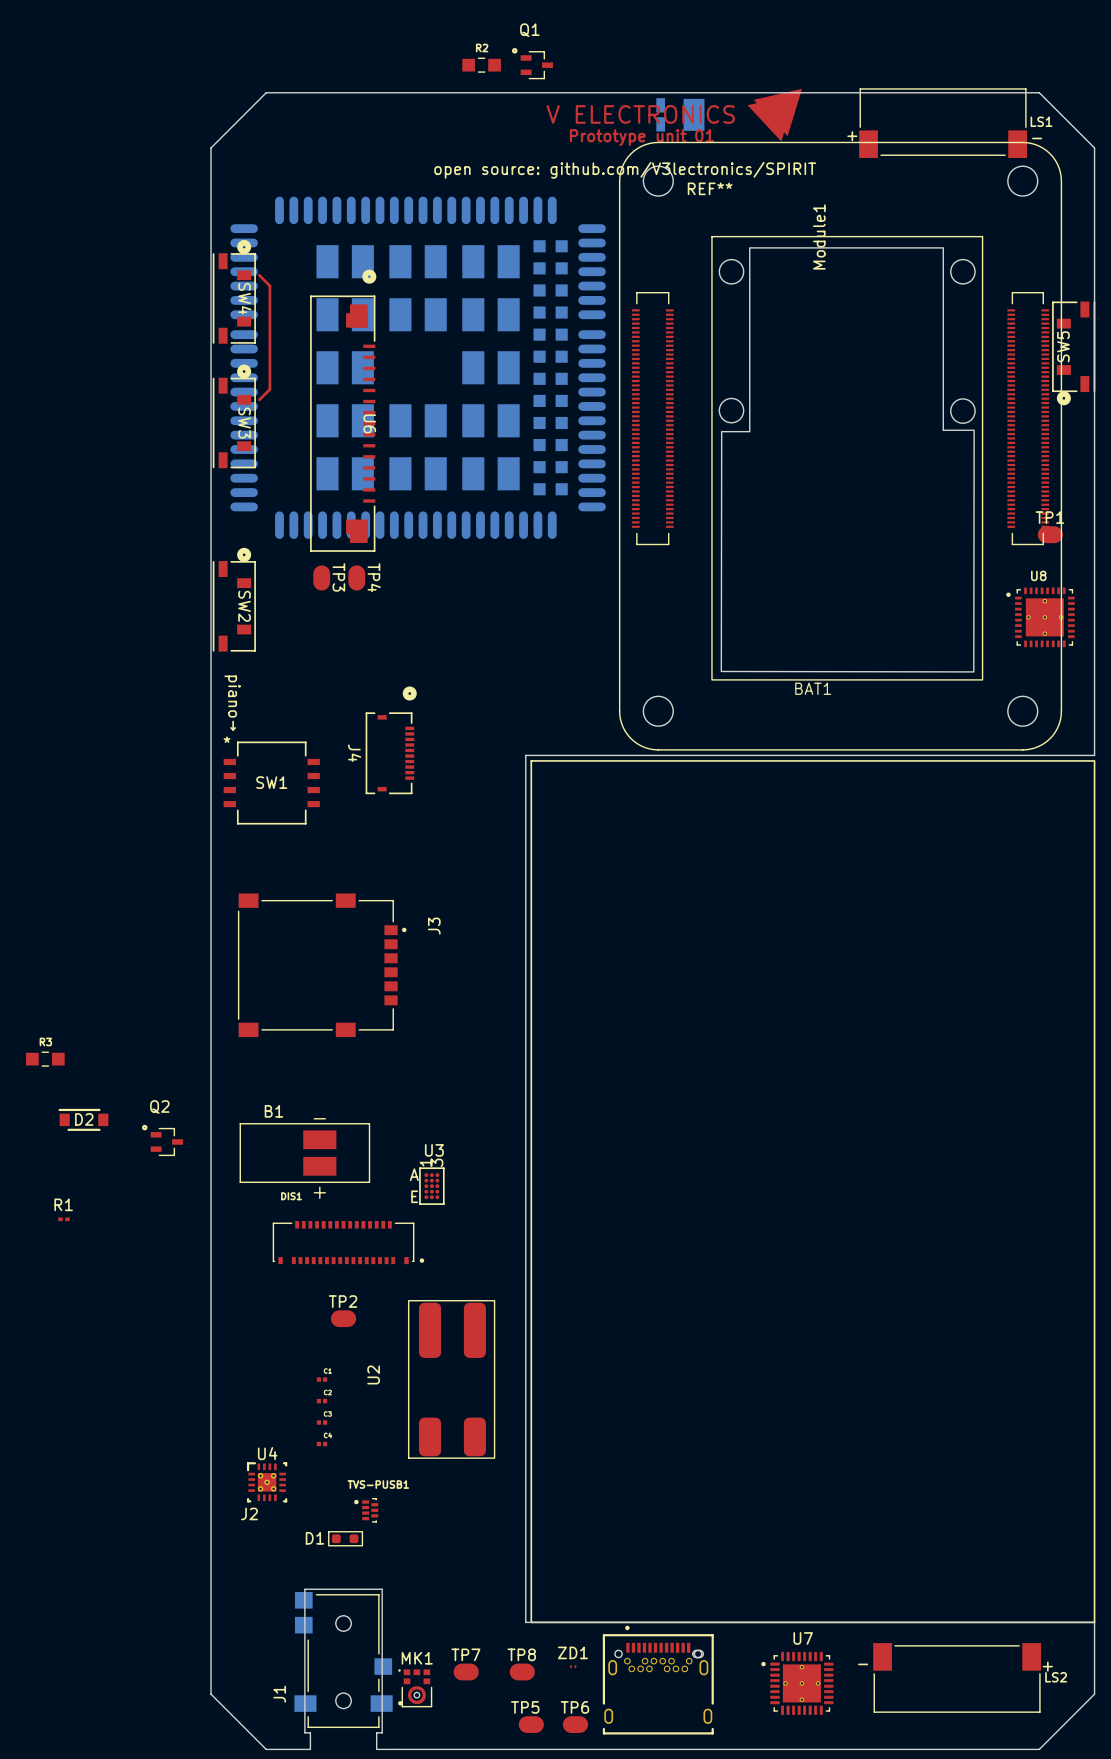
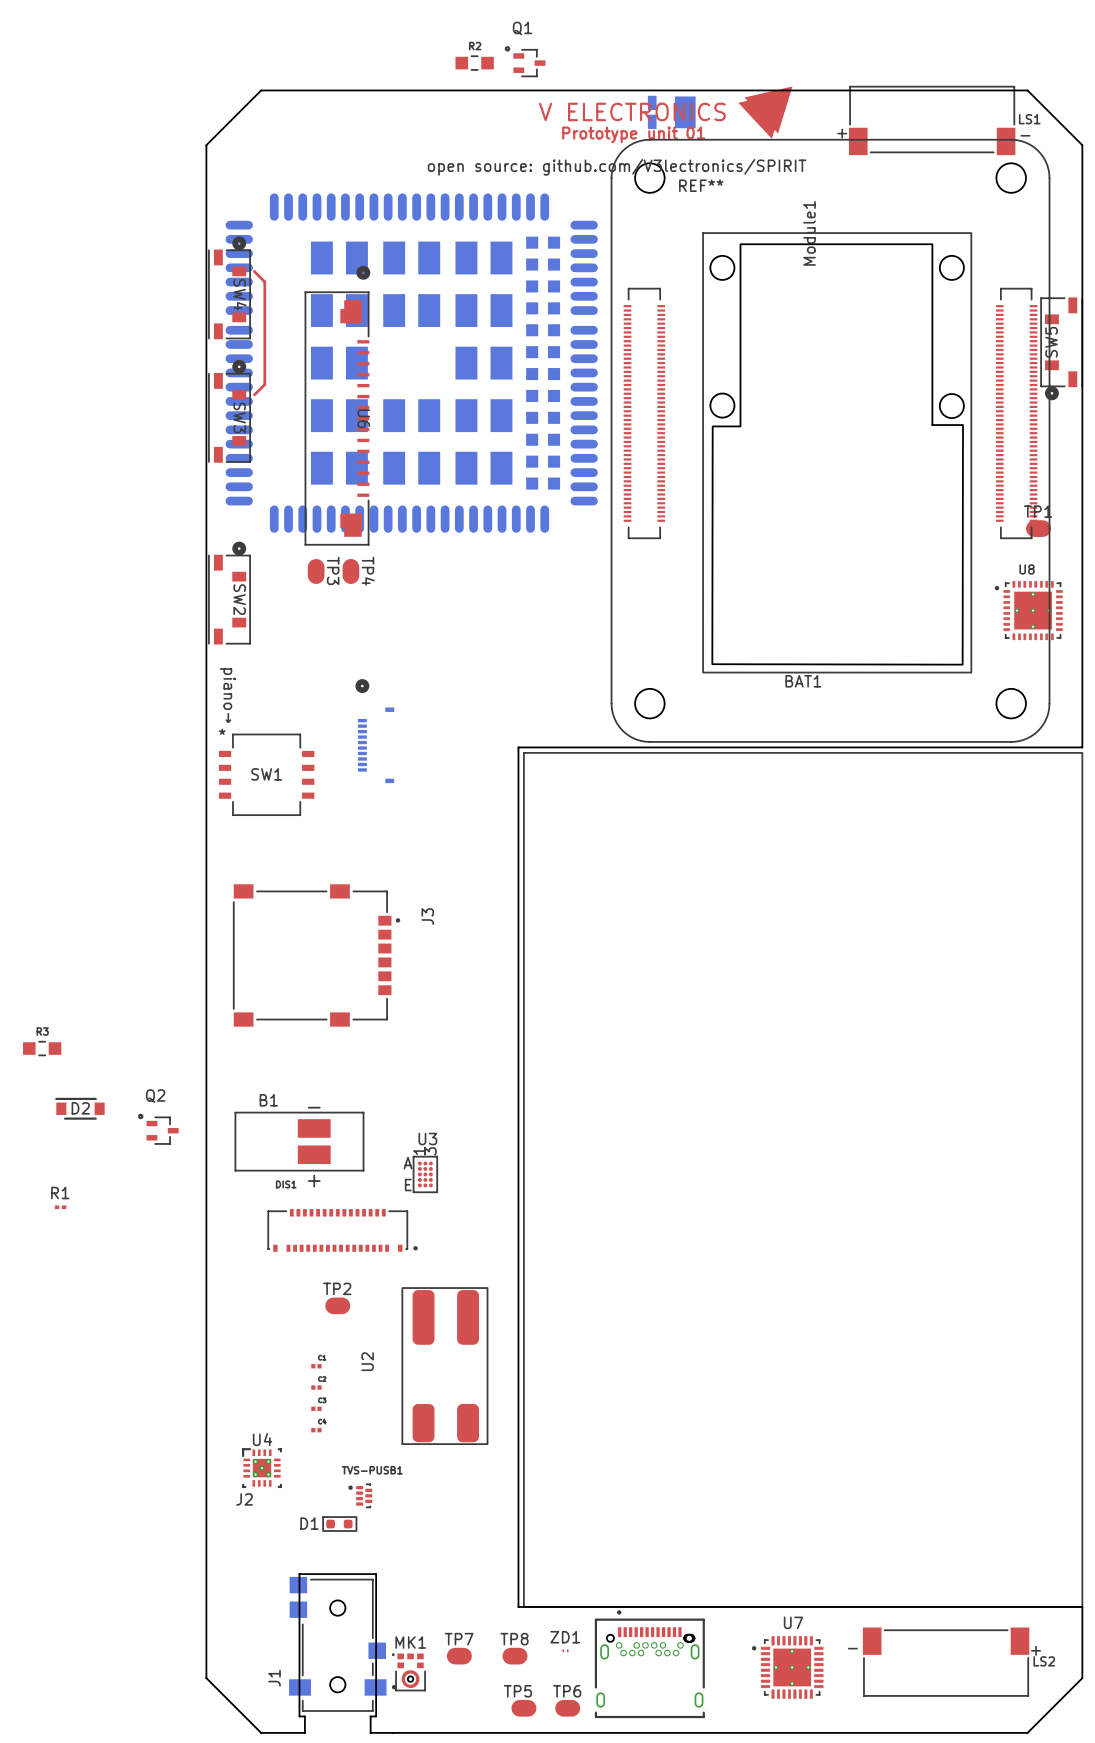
J4 side: top (391, 740) -> bottom (374, 731)

